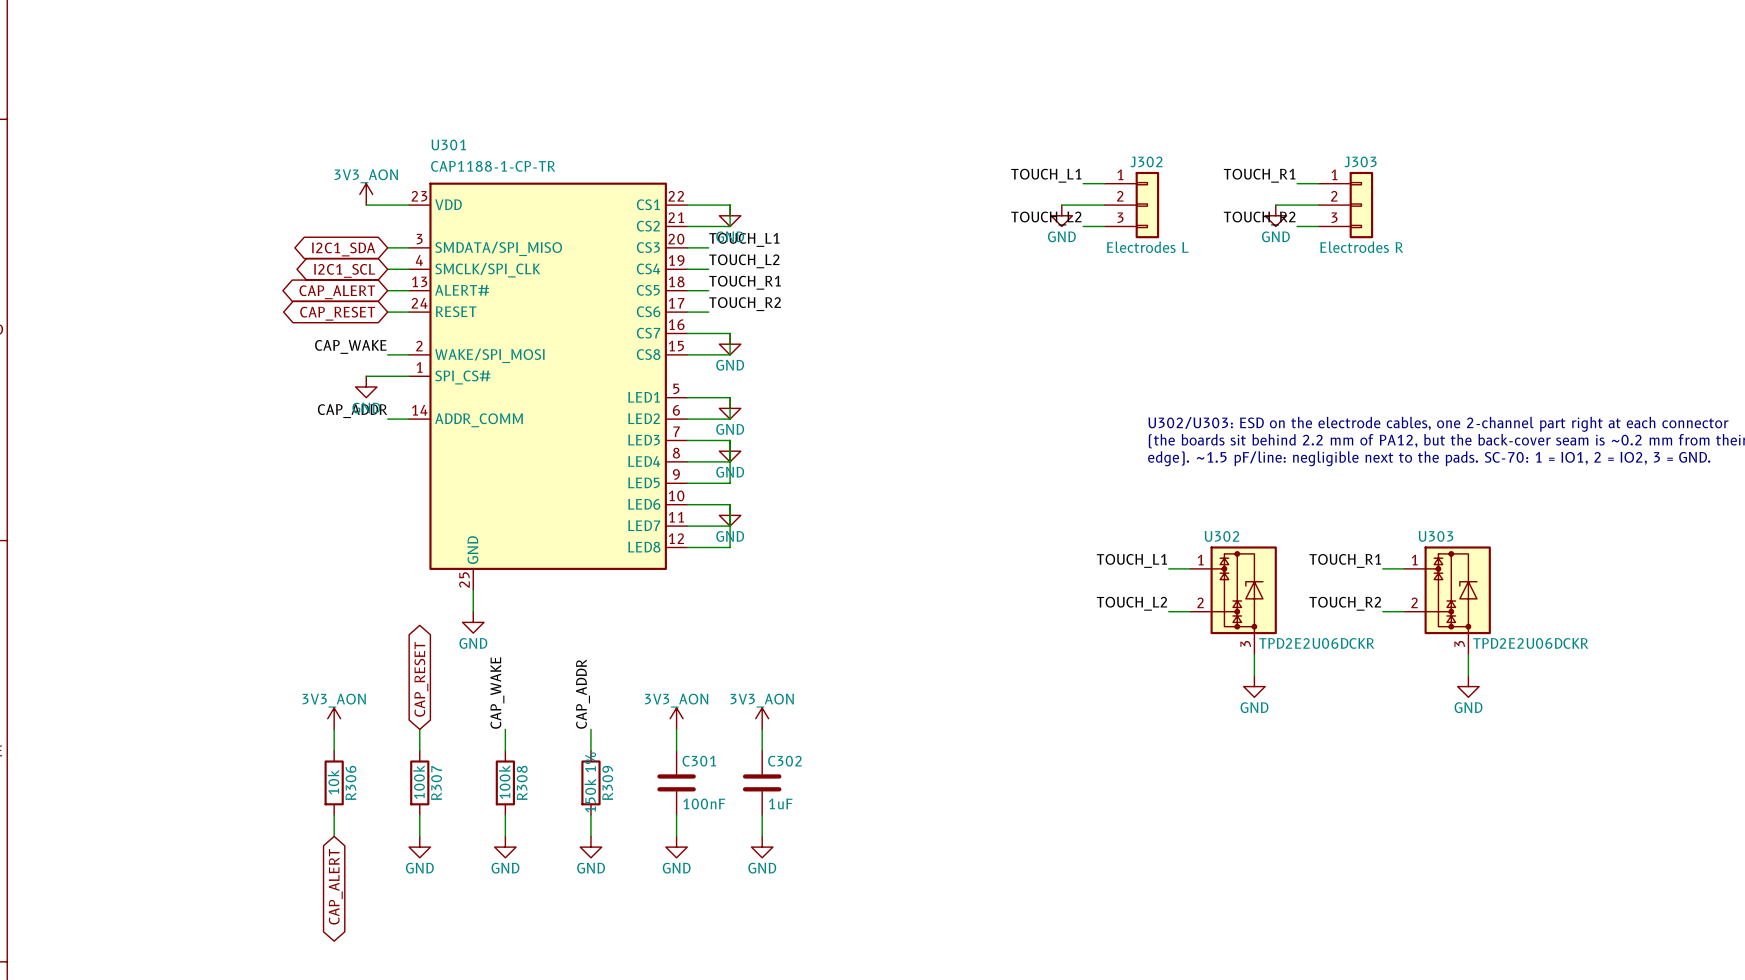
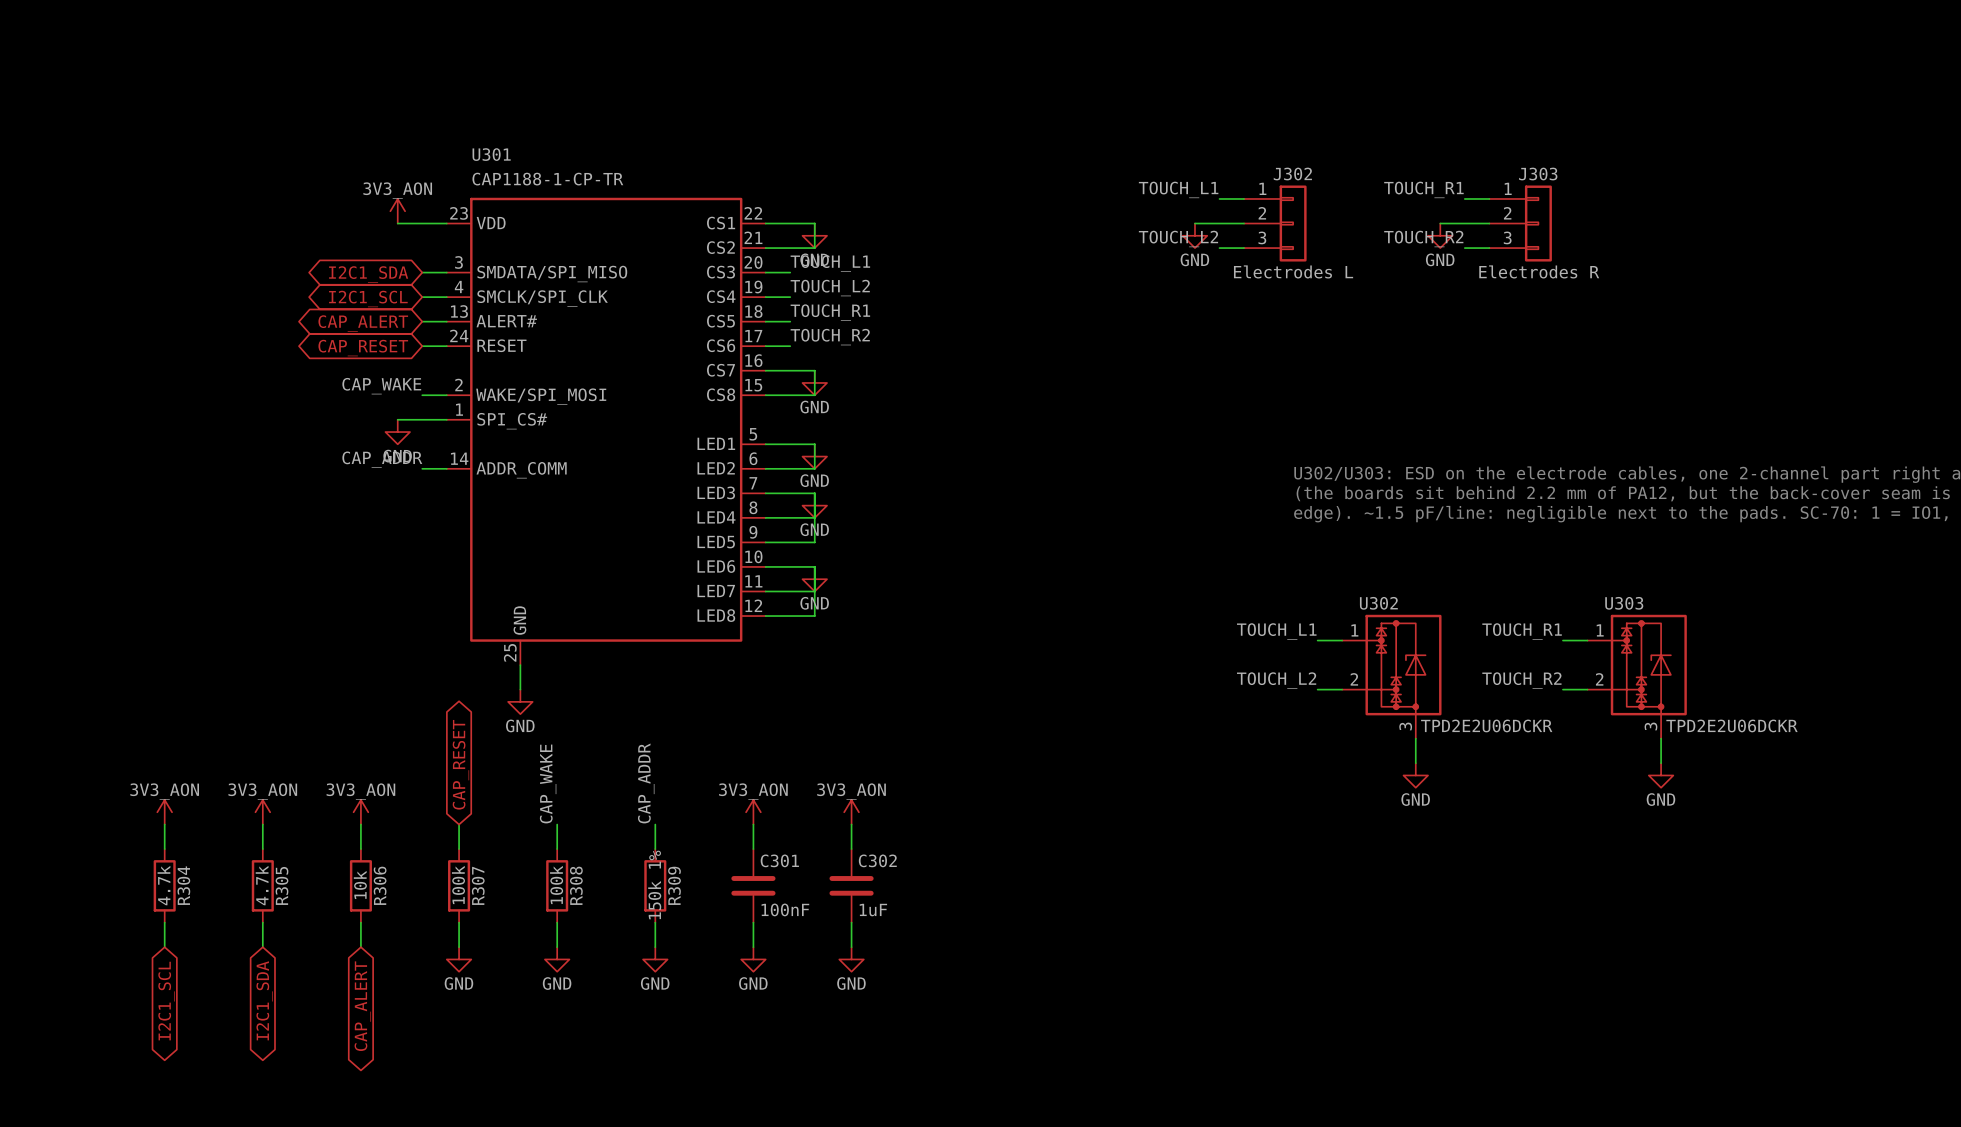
power symbol: none -> 3V3_AON (164, 812)
power symbol: none -> 3V3_AON (262, 812)
wire: none -> (164, 824) (164, 849)
wire: none -> (262, 824) (262, 849)
R304: none -> 4.7k (164, 885)
R305: none -> 4.7k (262, 885)
wire: none -> (164, 922) (164, 947)
wire: none -> (262, 922) (262, 947)
global label: none -> I2C1_SCL (166, 1001)
global label: none -> I2C1_SDA (264, 1000)

